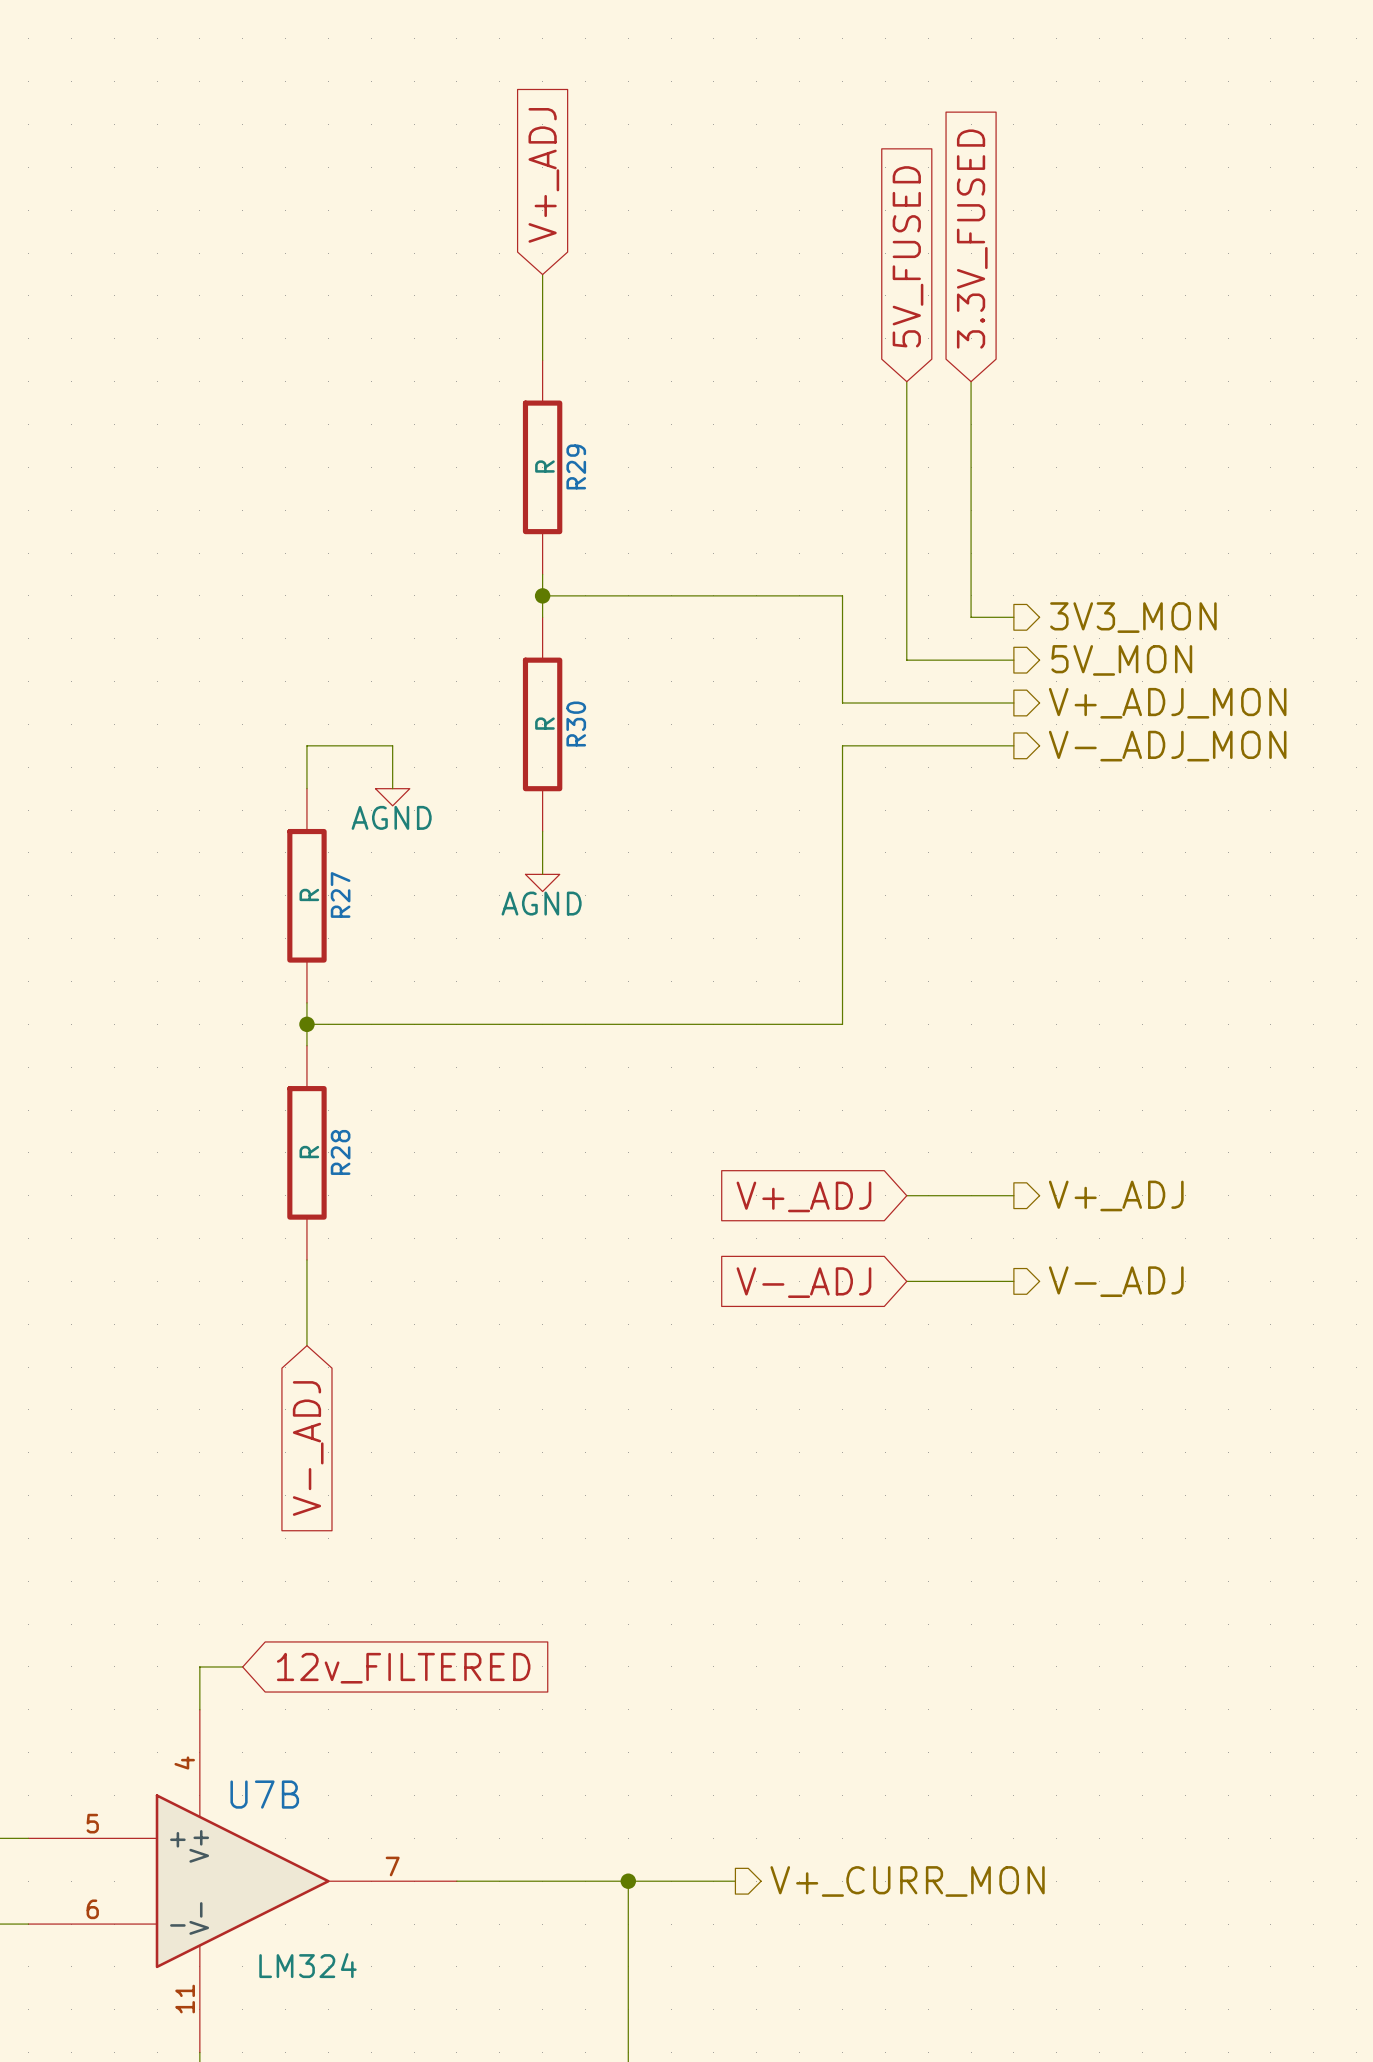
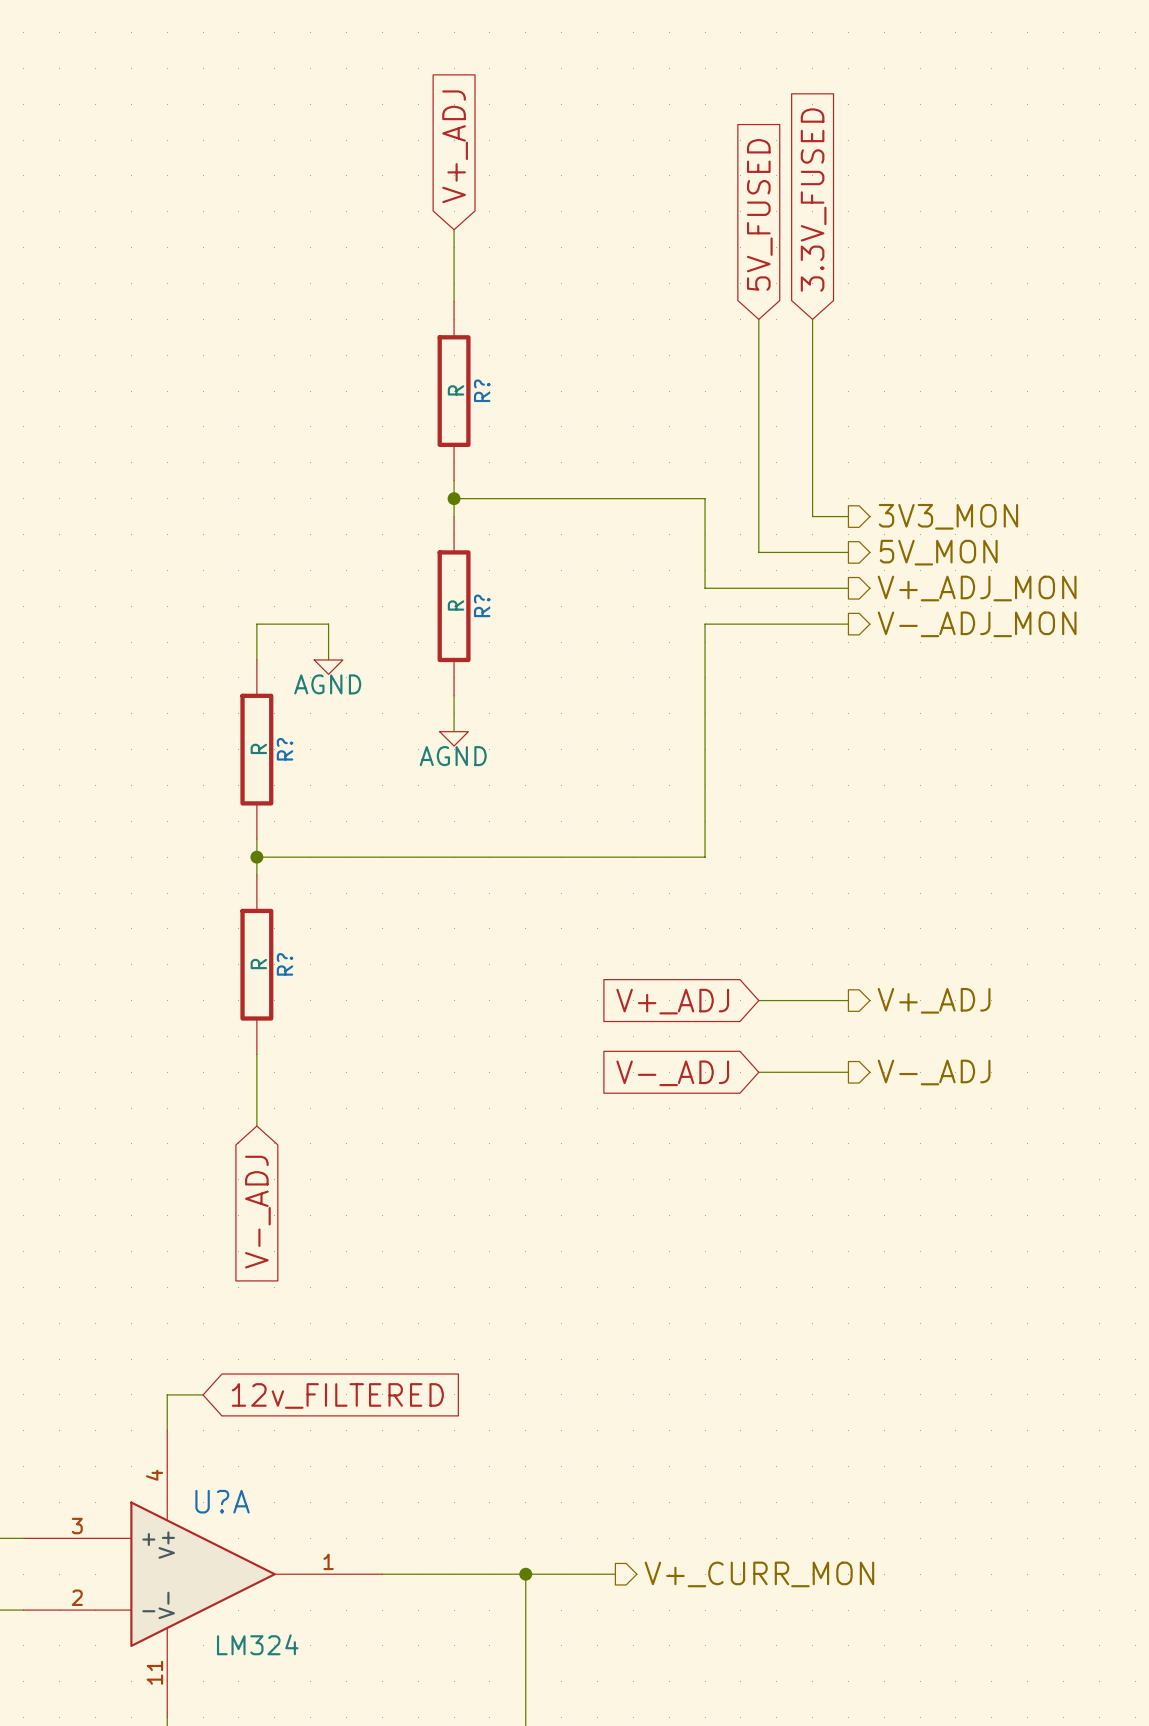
R29 name: R29 (576, 466) -> R? (482, 390)
R30 name: R30 (576, 724) -> R? (482, 605)
R27 name: R27 (340, 894) -> R? (285, 749)
R28 name: R28 (340, 1152) -> R? (285, 964)
U7B name: U7B (264, 1794) -> U?A (222, 1501)
U7B pin number: 5 (92, 1823) -> 3 (77, 1526)
U7B pin number: 7 (392, 1866) -> 1 (328, 1561)
U7B pin number: 6 (92, 1909) -> 2 (77, 1597)

